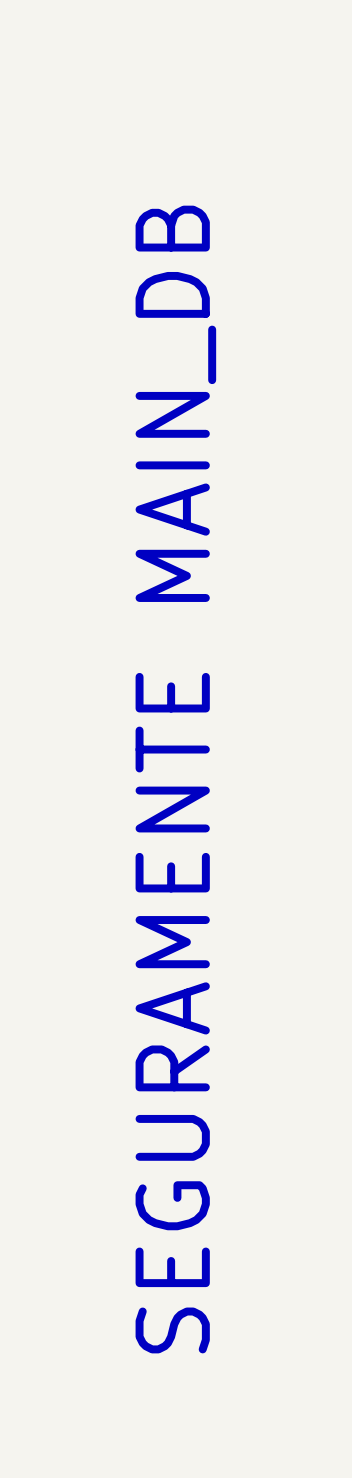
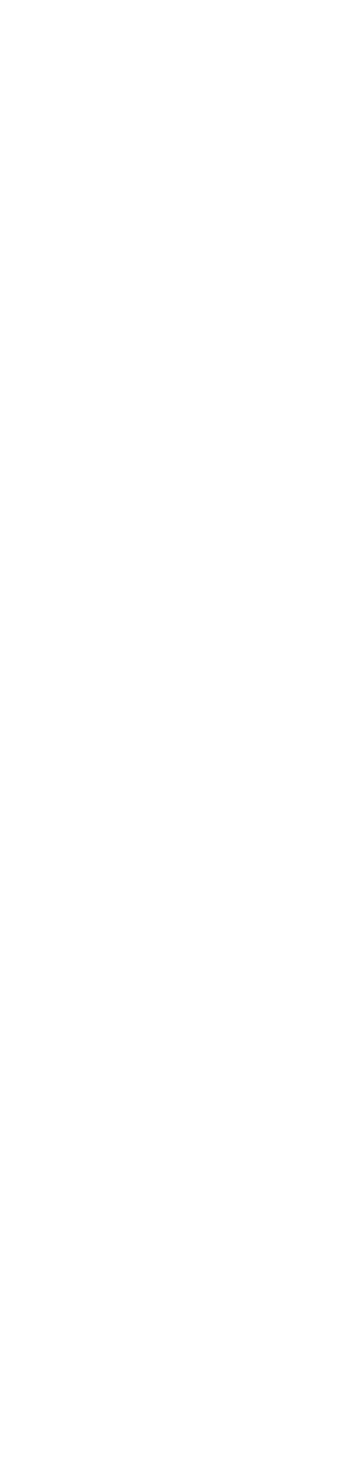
text: SEGURAMENTE MAIN_DB (175, 779) -> none

